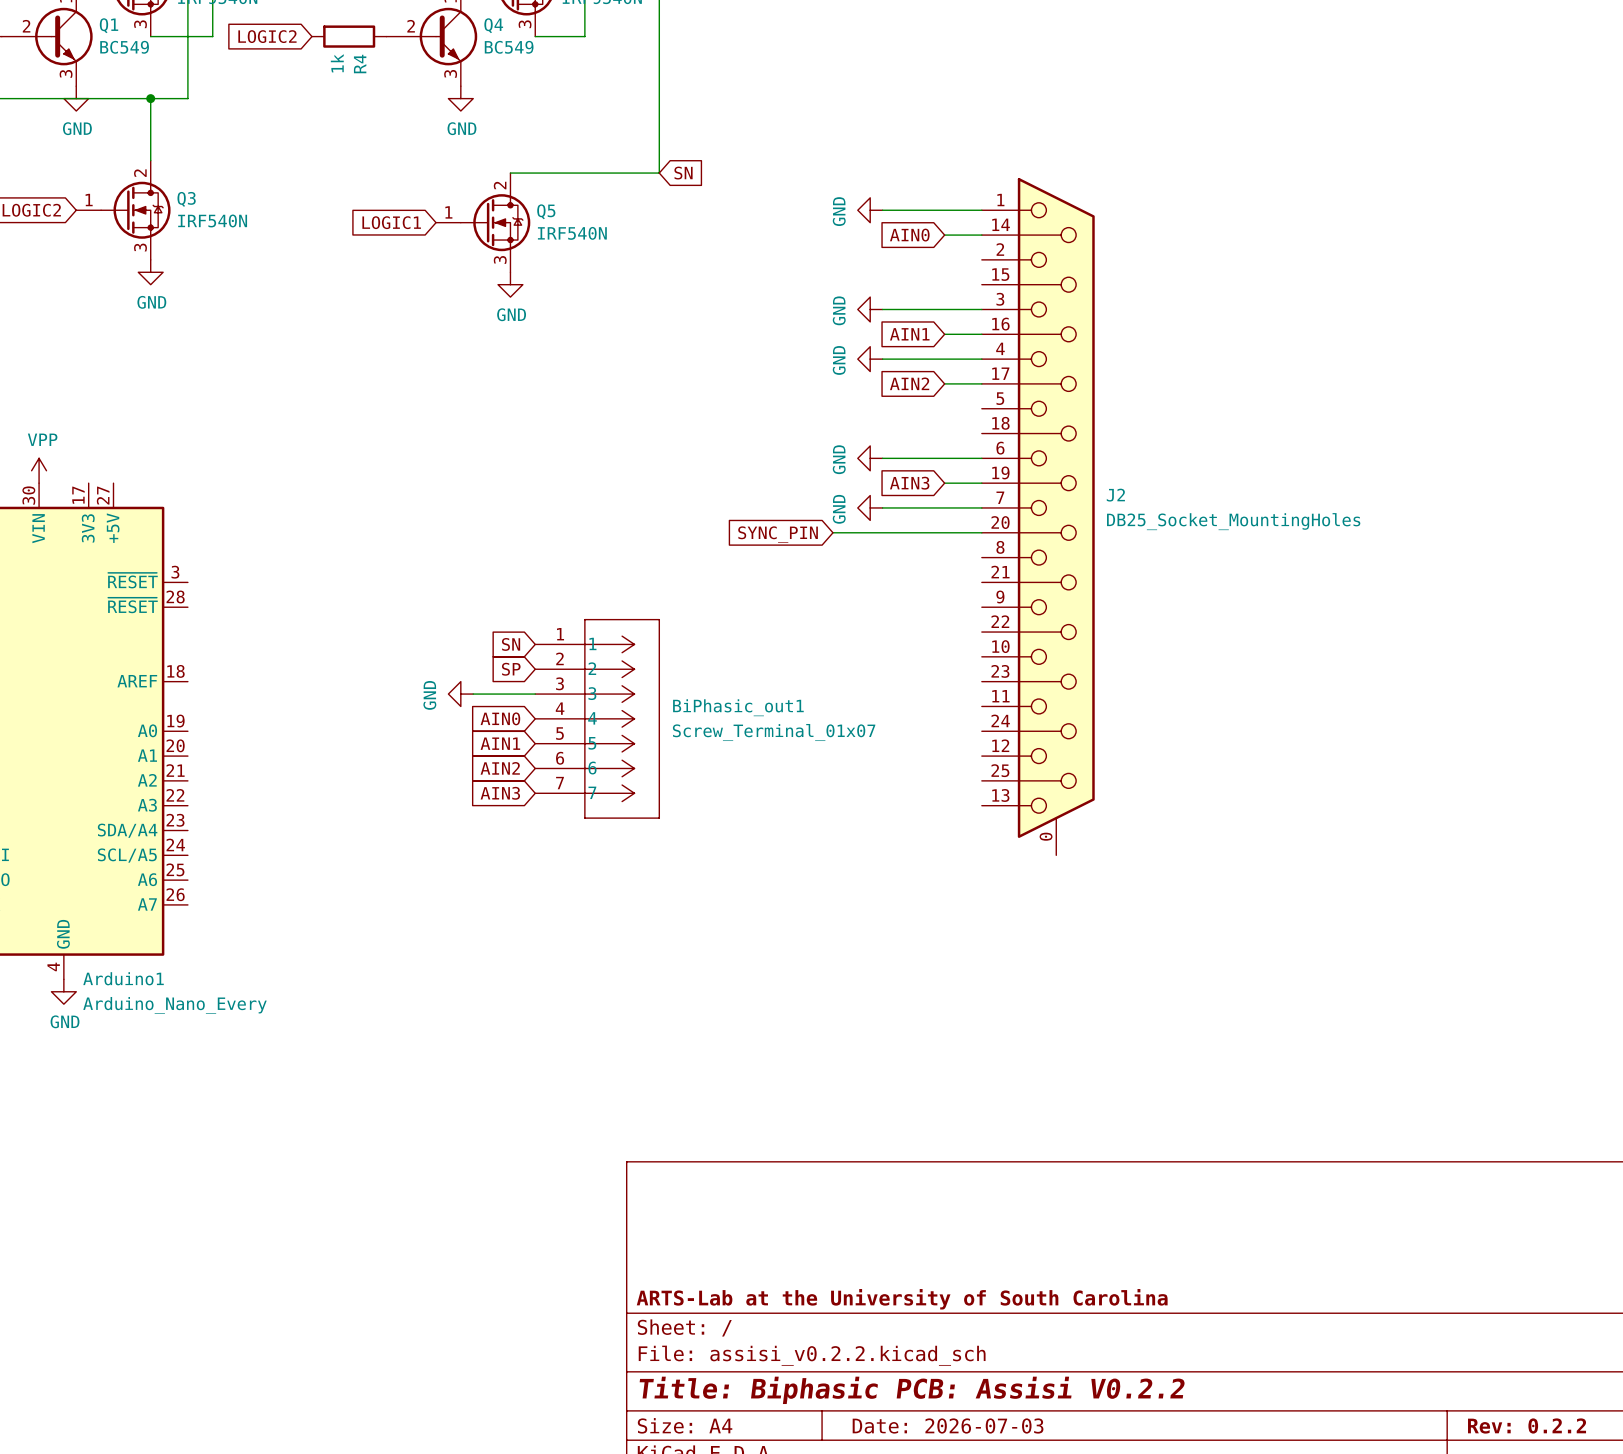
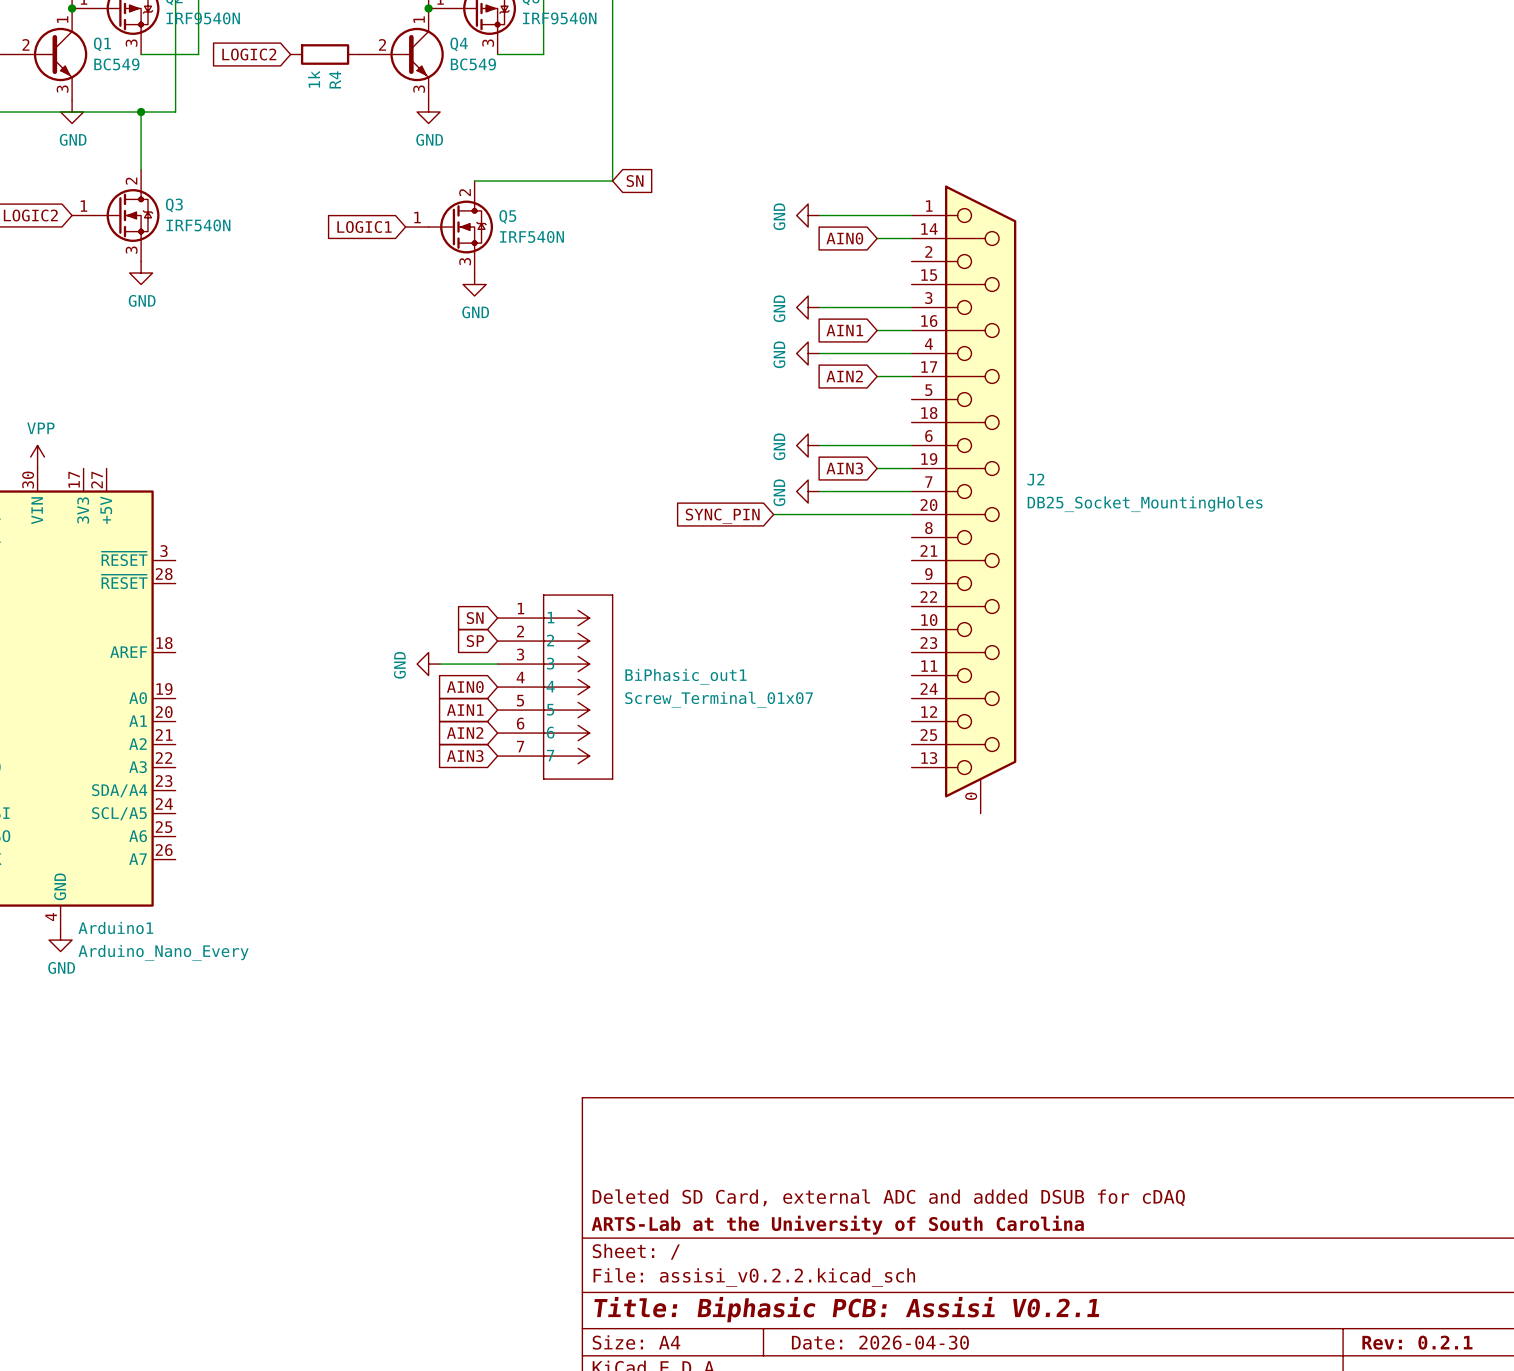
title block: none -> Deleted SD Card, external ADC and added DSUB for cDAQ (888, 1197)
title block: Title: Biphasic PCB: Assisi V0.2.2 (912, 1390) -> Title: Biphasic PCB: Assisi V0.2.1 (846, 1309)
title block: Date: 2026-07-03 (948, 1425) -> Date: 2026-04-30 (880, 1342)
title block: Rev: 0.2.2 (1527, 1425) -> Rev: 0.2.1 (1417, 1342)

